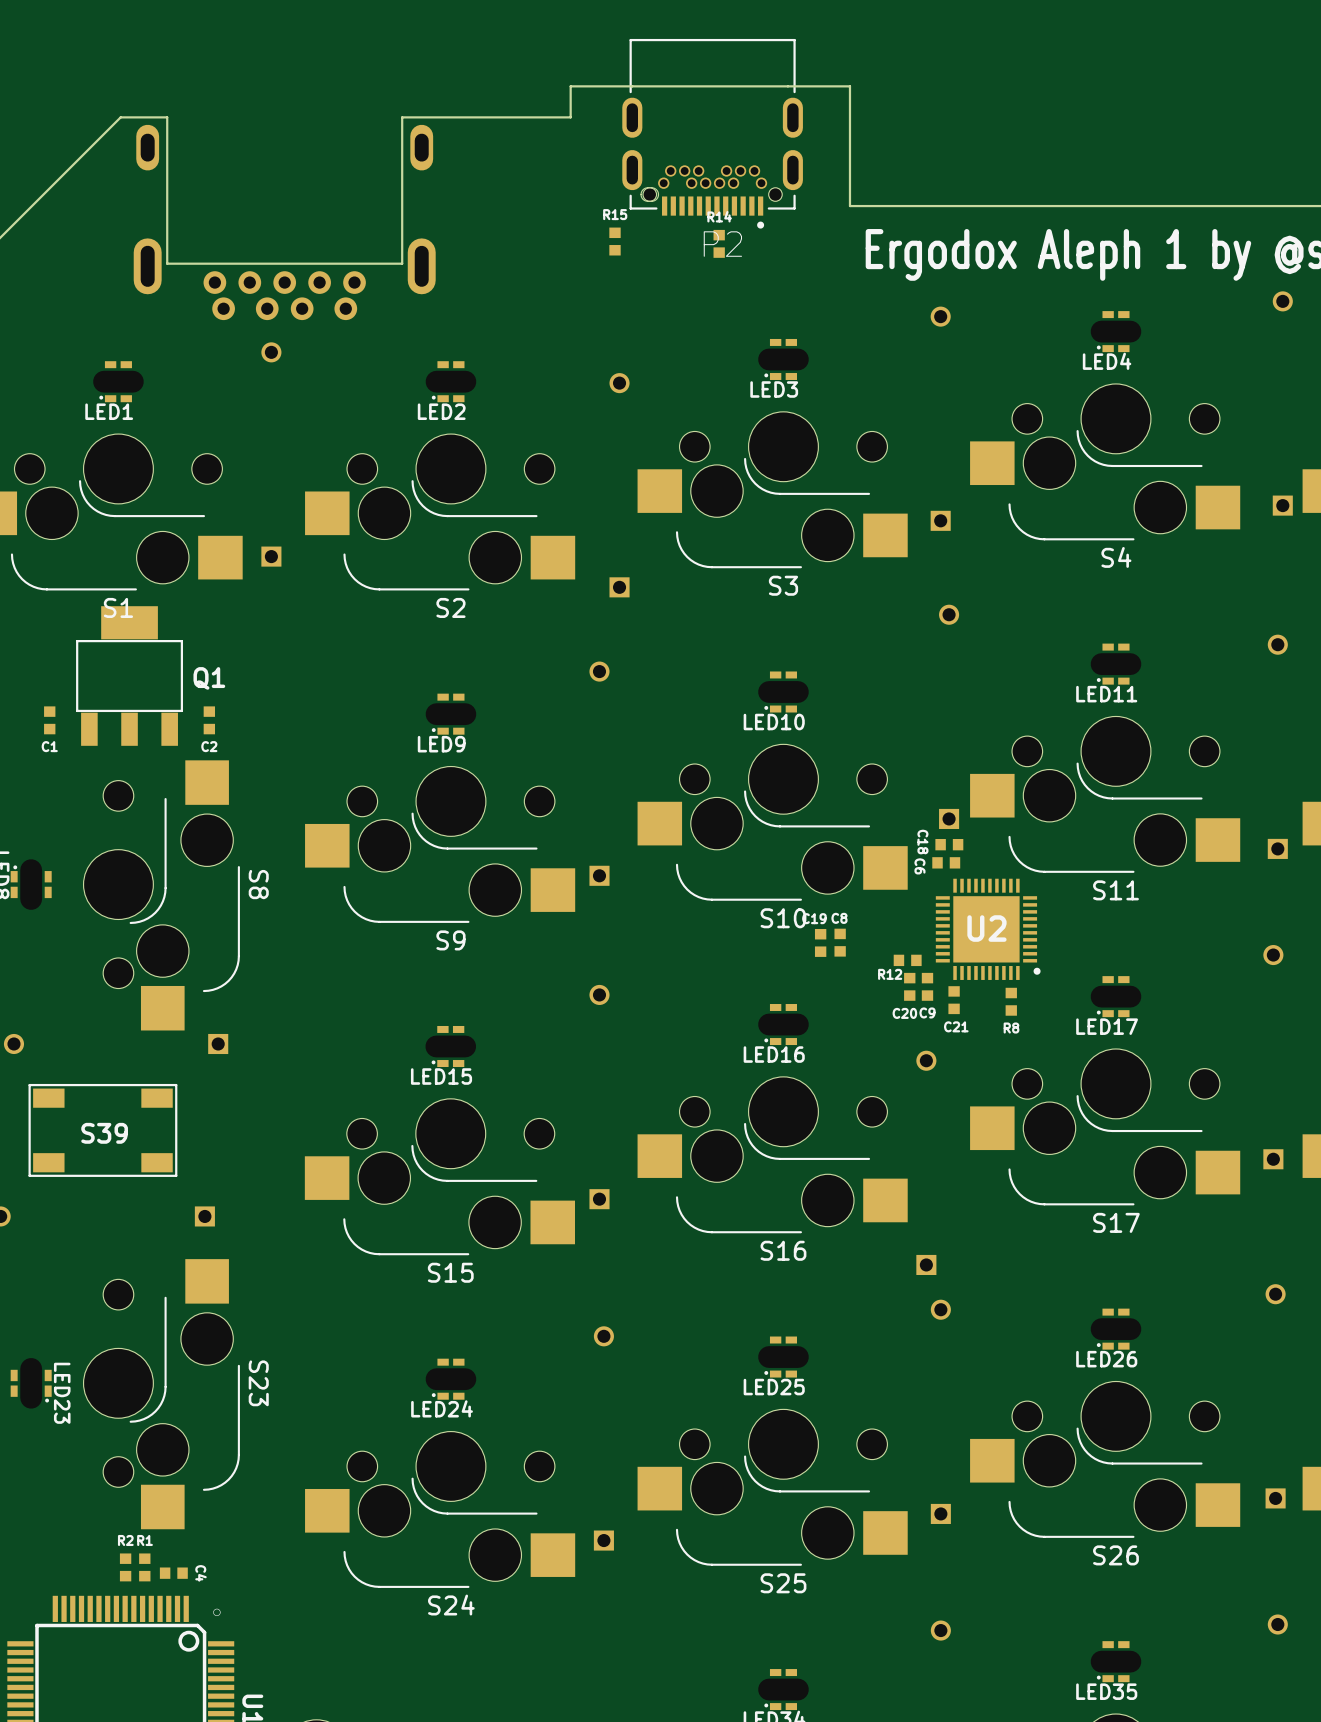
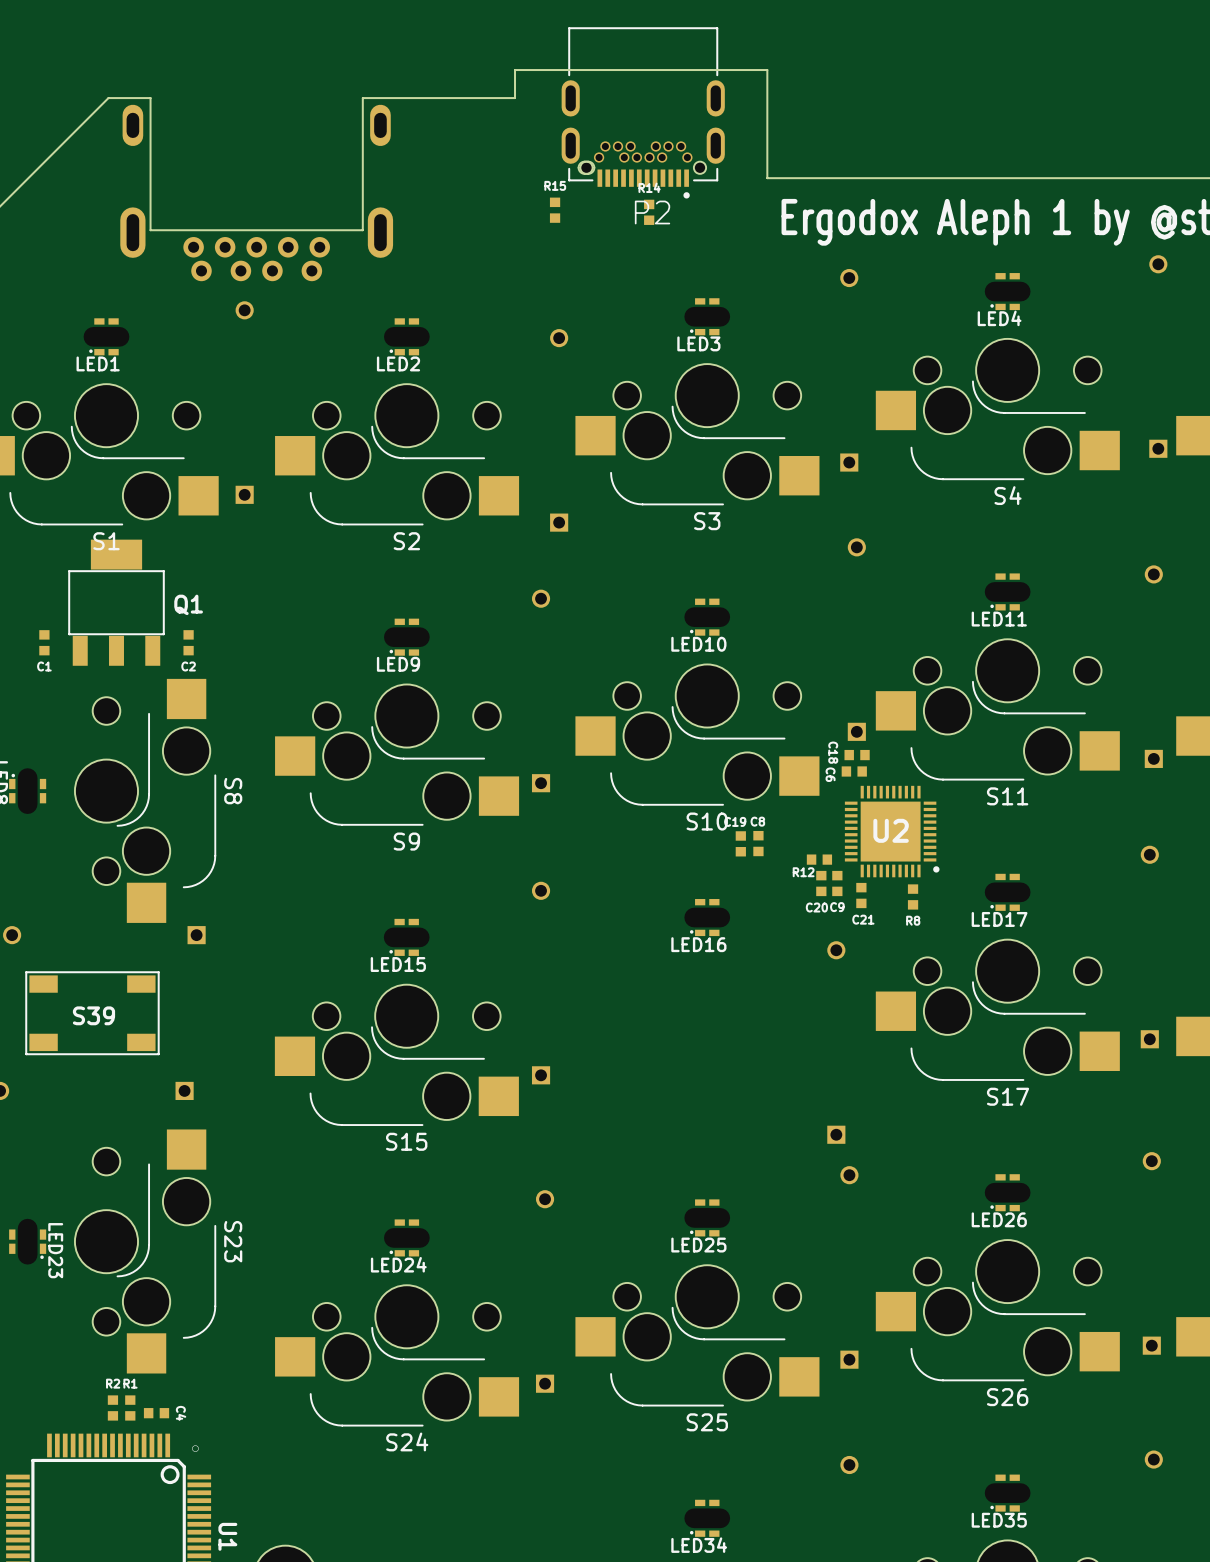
S16: (772, 1155) -> none

